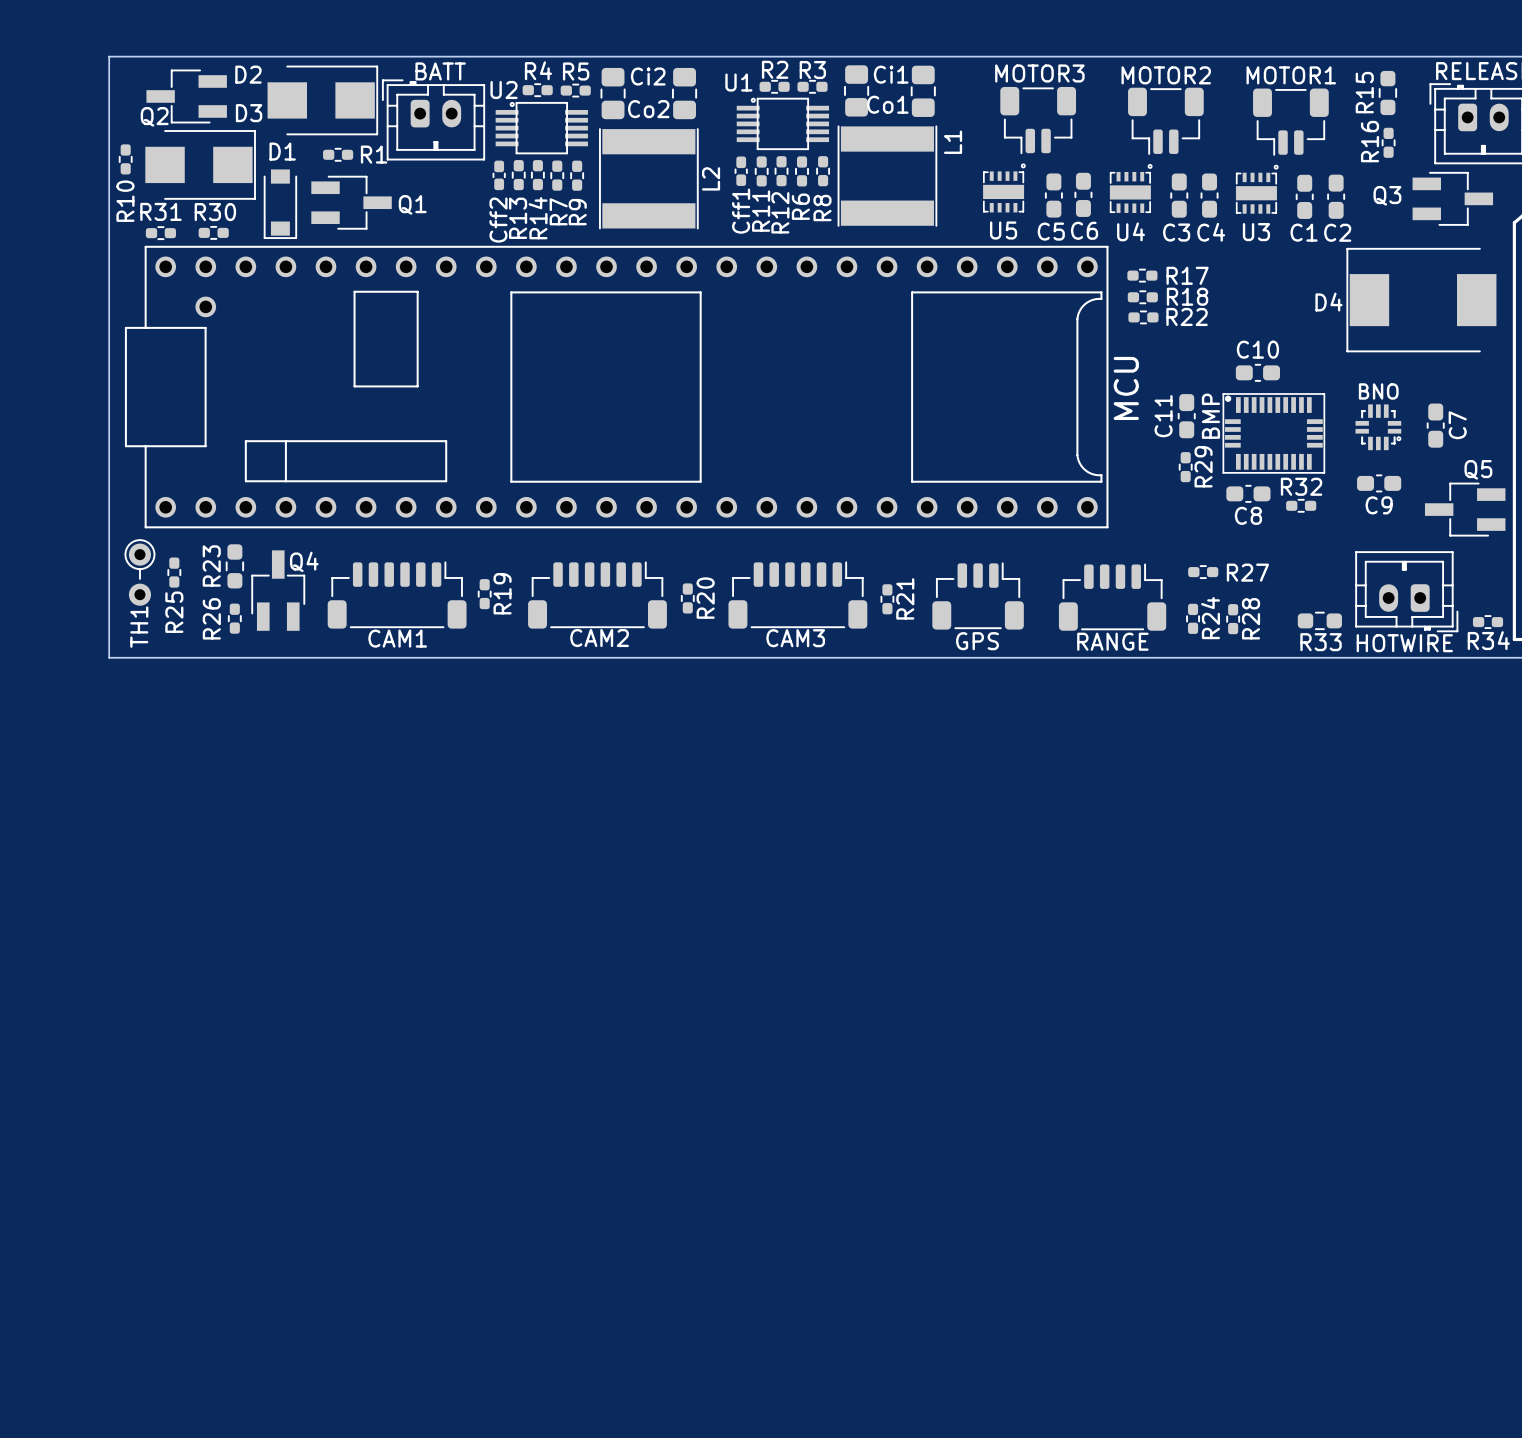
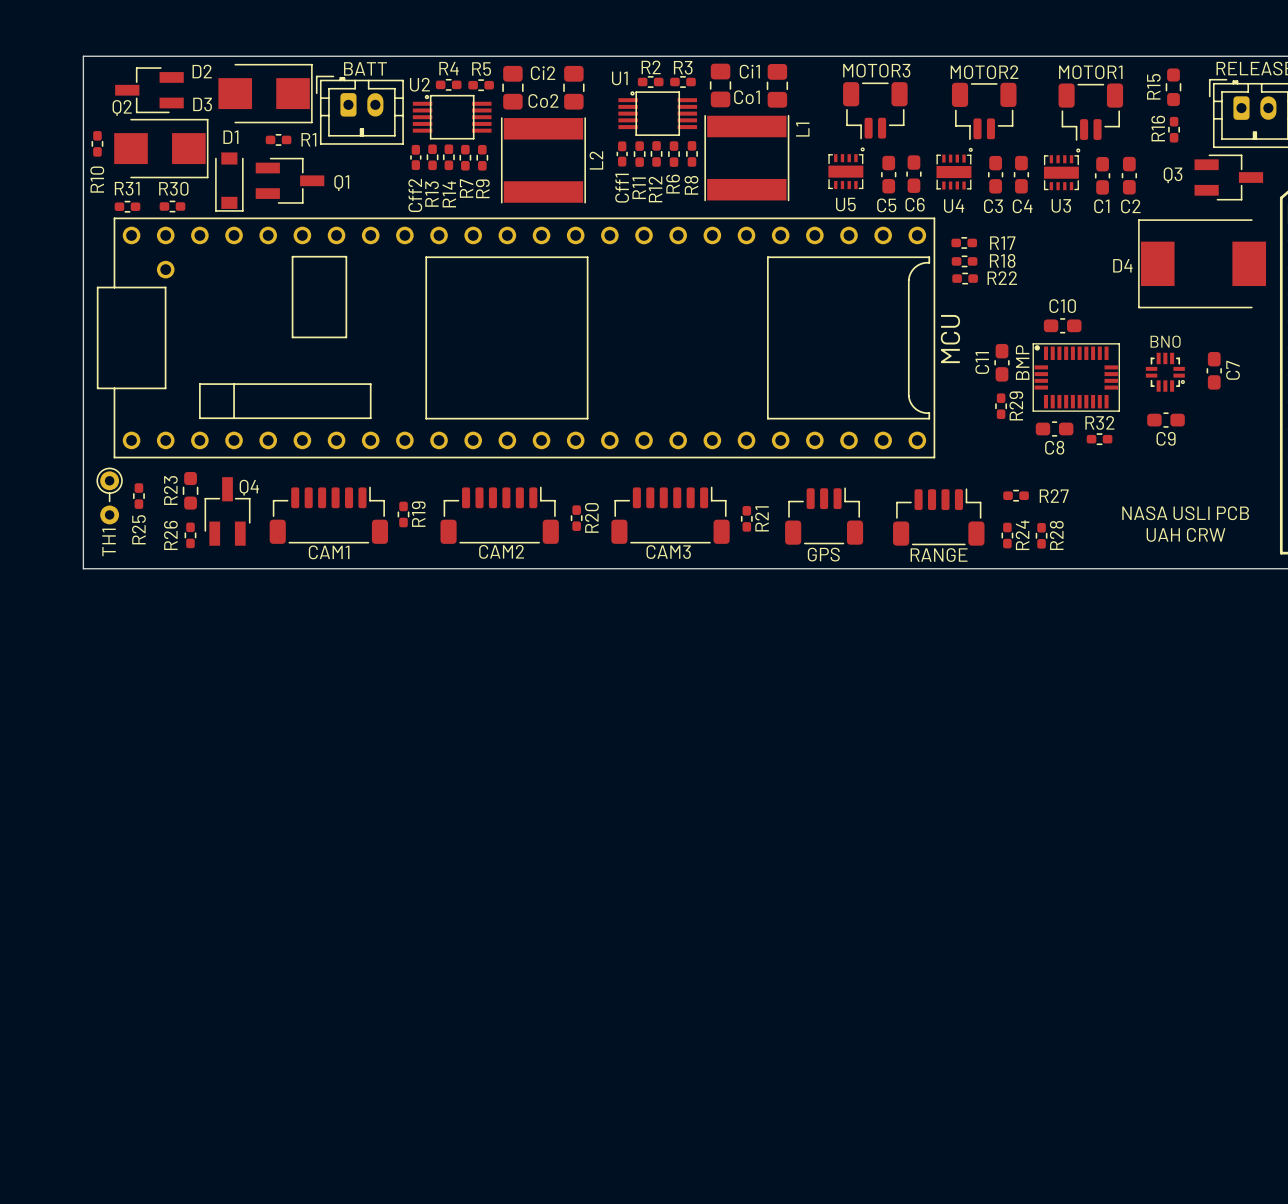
Q5: (1465, 509) -> none
HOTWIRE: (1406, 591) -> none
text: none -> NASA USLI PCB (1185, 513)
text: none -> UAH CRW (1185, 534)
R33: (1319, 620) -> none
R34: (1488, 622) -> none

